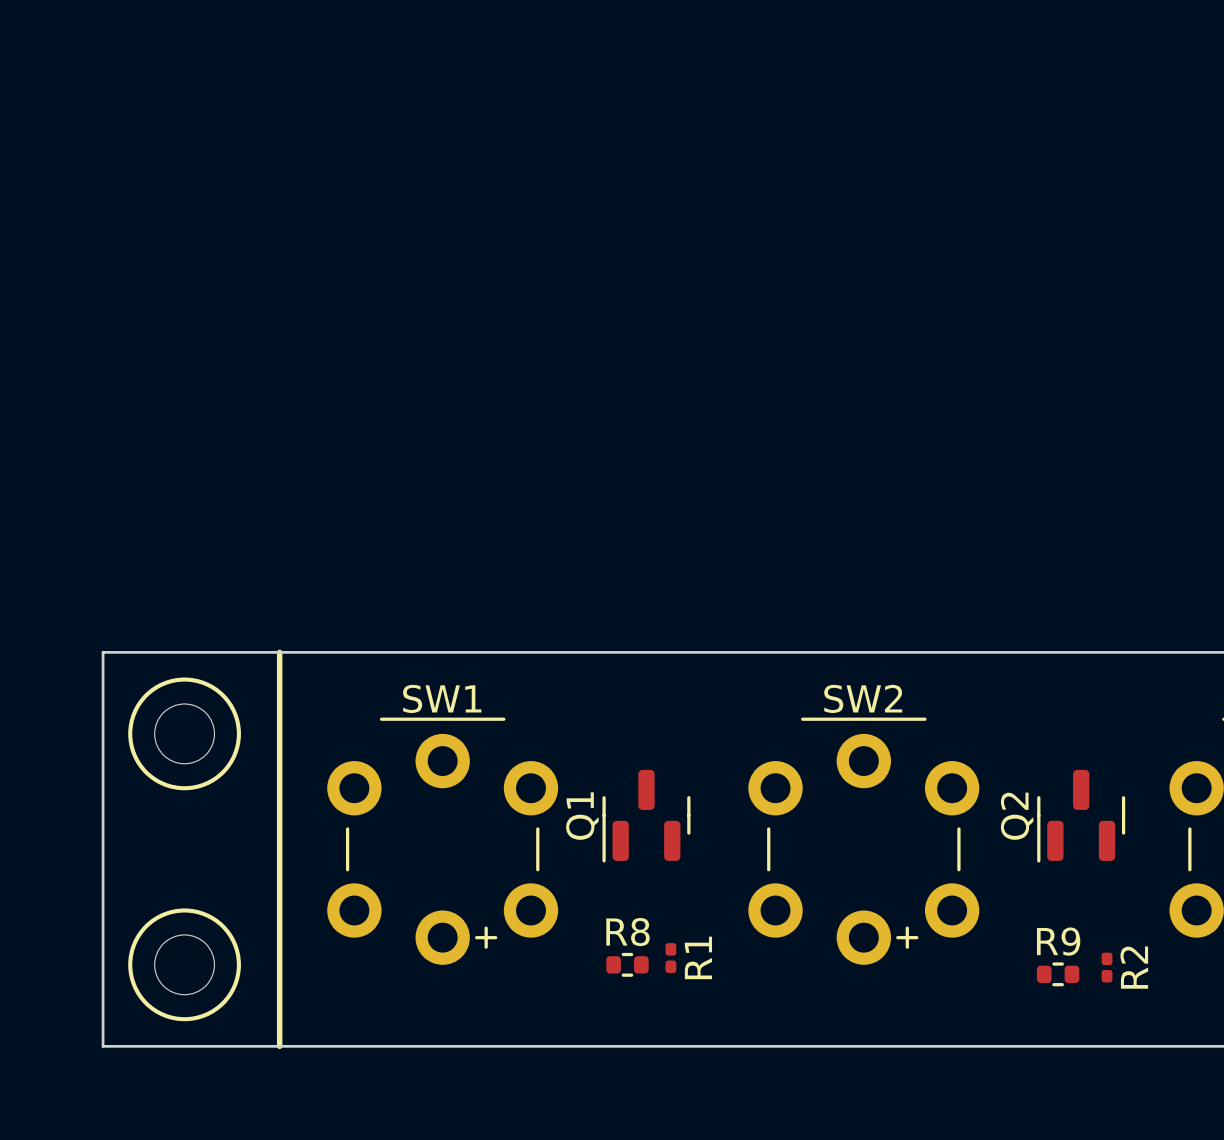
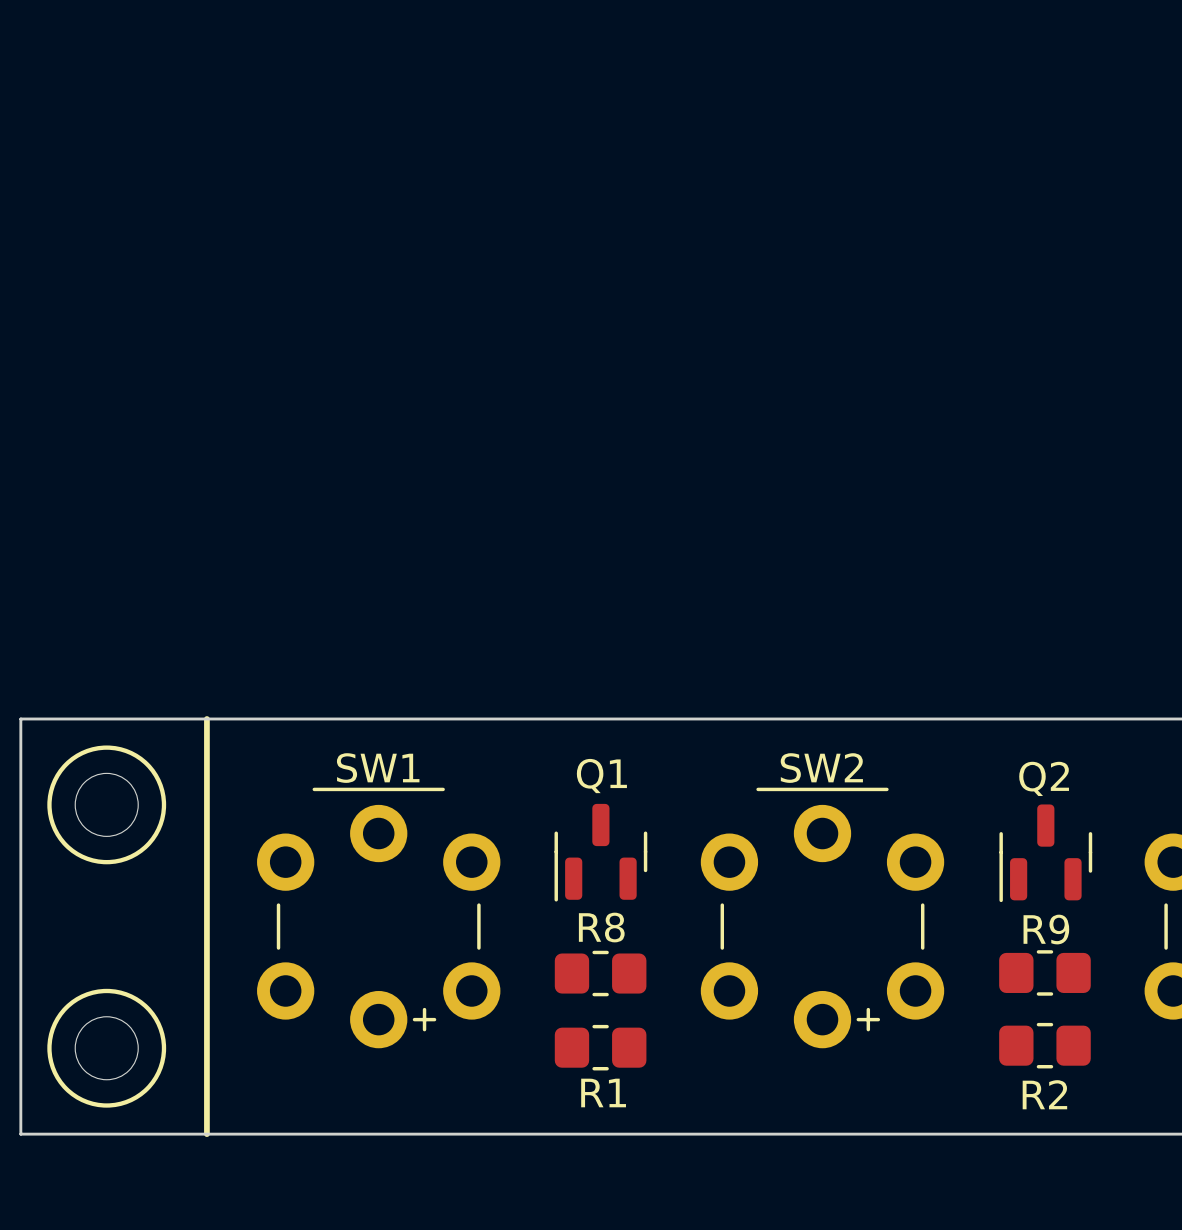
Q1 name rotation: 0° (582, 816) -> 90° clockwise (601, 776)
Q1 name position: Q1 (582, 816) -> Q1 (601, 776)
Q1 position: (646, 816) -> (600, 852)
Q2 name rotation: 0° (1017, 816) -> 90° clockwise (1044, 778)
Q2 name position: Q2 (1017, 816) -> Q2 (1044, 778)
Q2 position: (1081, 816) -> (1045, 853)
R1 footprint: [665, 943, 677, 973] -> [554, 1024, 647, 1071]
R8 footprint: [606, 952, 649, 977] -> [554, 950, 647, 997]
R2 footprint: [1101, 952, 1113, 983] -> [999, 1022, 1091, 1069]
R9 footprint: [1036, 962, 1080, 987] -> [999, 950, 1091, 996]
R2 name position: R2 (1134, 967) -> R2 (1044, 1094)

